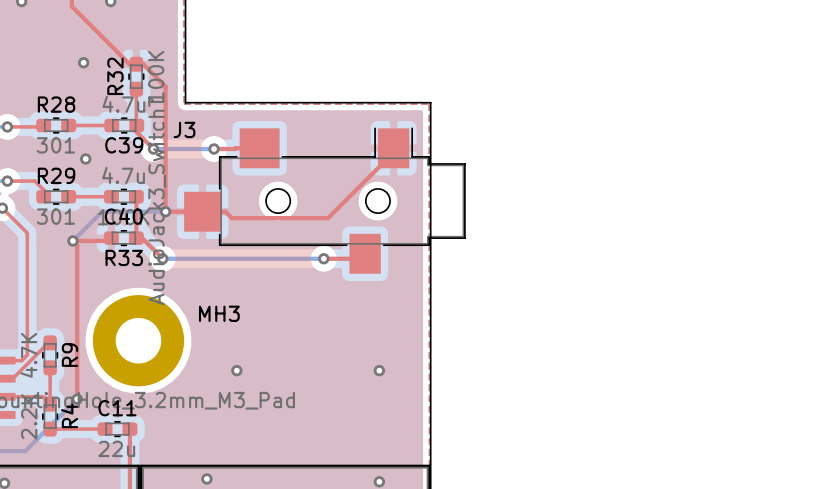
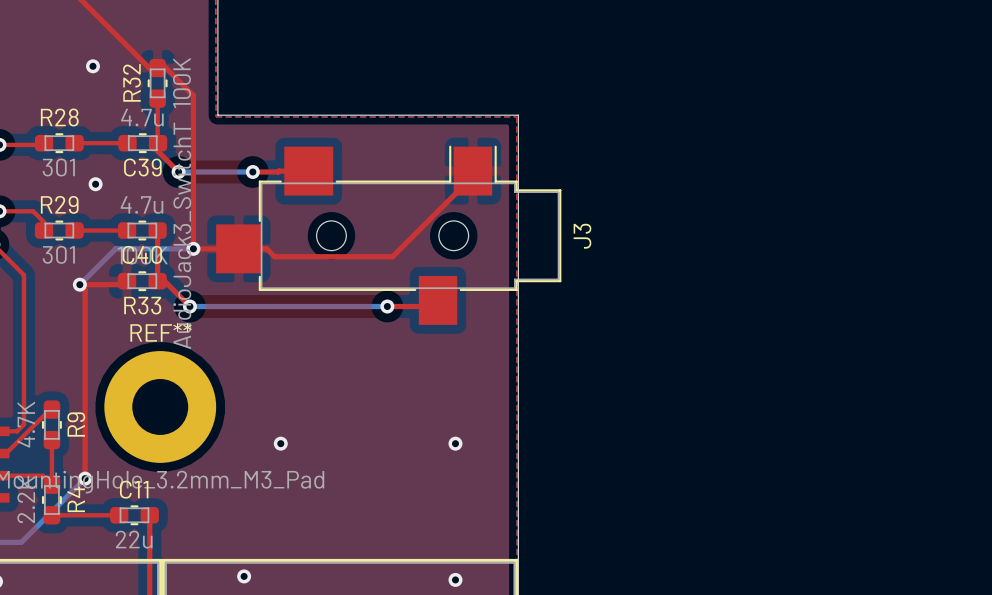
J3 name rotation: 0° (184, 129) -> 90° counterclockwise (582, 236)
J3 name position: J3 (184, 129) -> J3 (582, 236)
MH3 name: MH3 (219, 313) -> REF** (161, 332)

